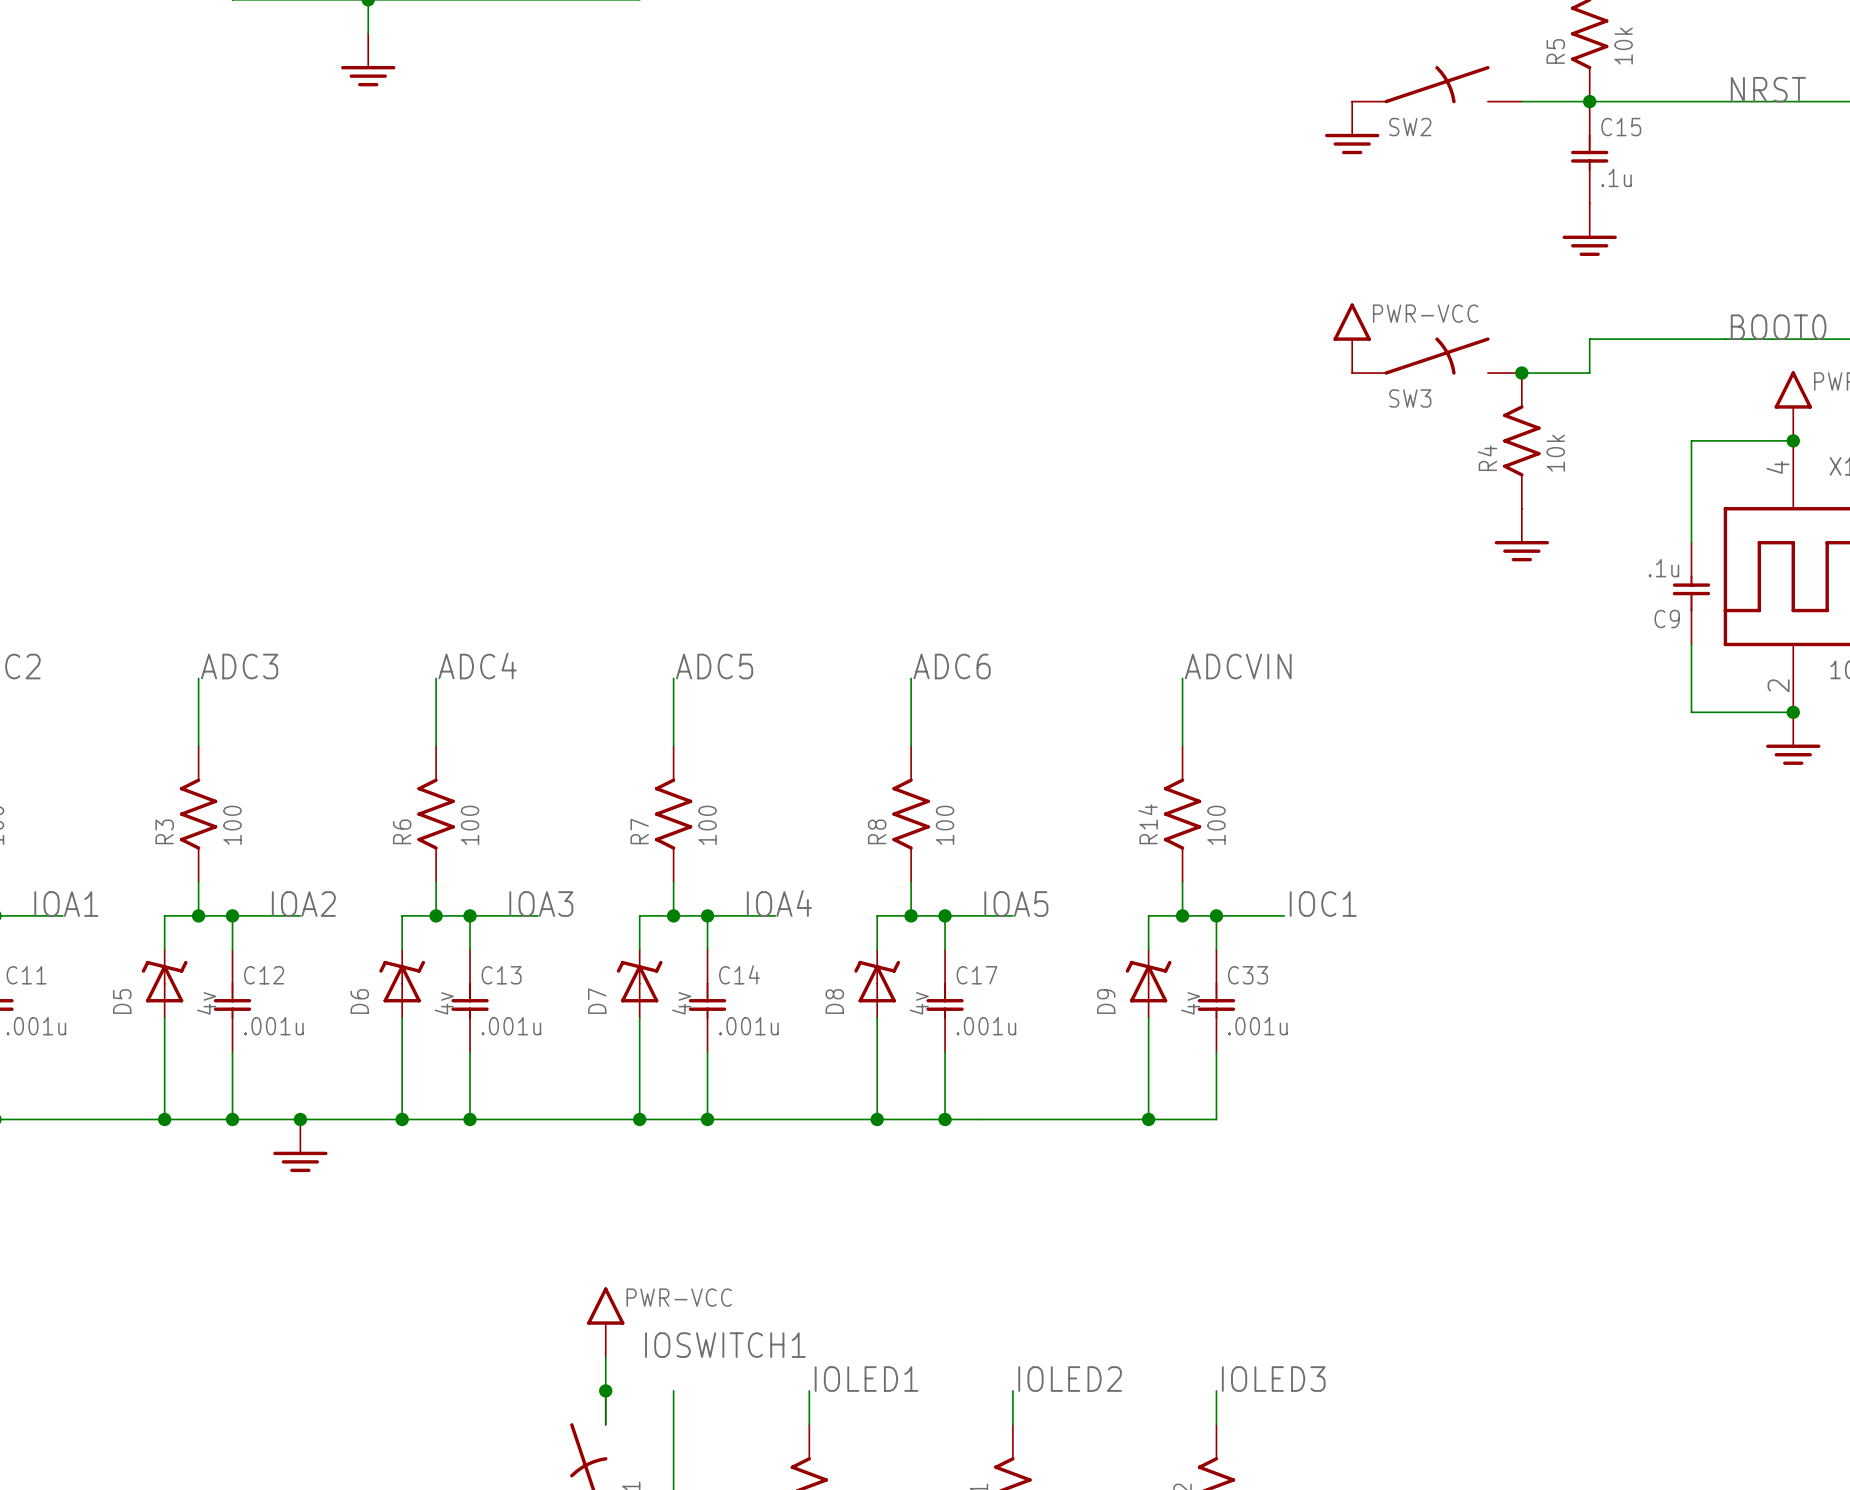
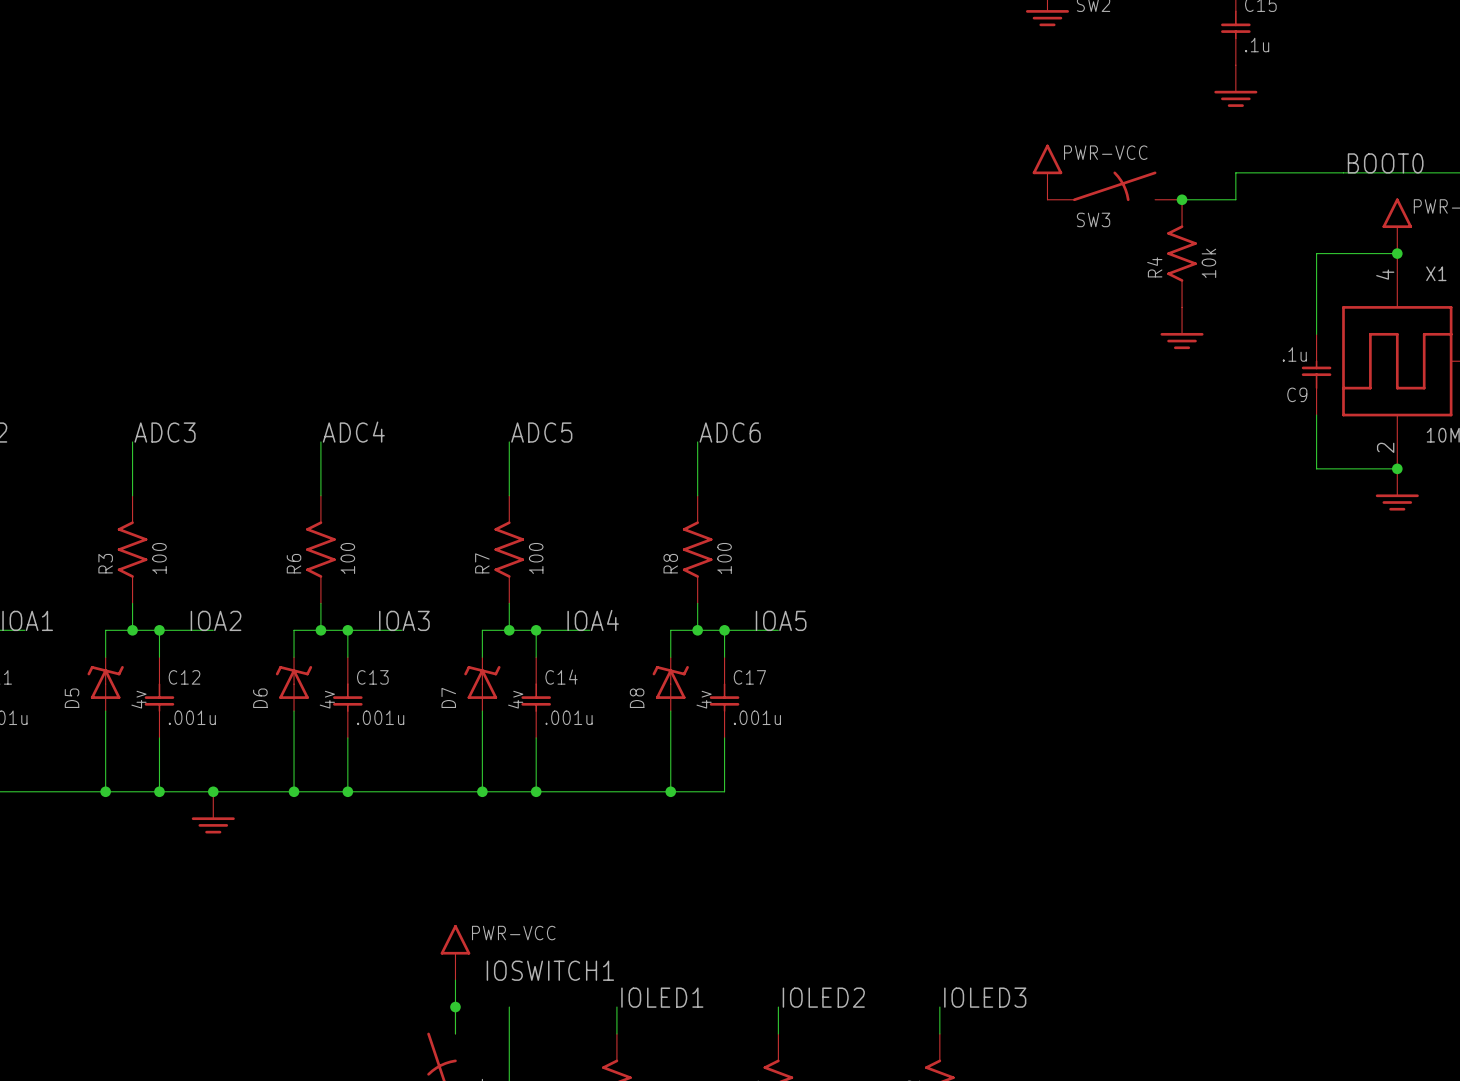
label: ADCVIN (1238, 666) -> none
wire: (1182, 678) (1182, 746) -> none
R14: 100 (1182, 814) -> none
wire: (1182, 881) (1182, 915) -> none
label: IOC1 (1323, 904) -> none
junction: (1182, 915) -> none
wire: (1216, 915) (1216, 949) -> none
junction: (1216, 915) -> none
wire: (1284, 915) (1148, 915) (1148, 949) -> none
D9: 4v (1148, 983) -> none
C33: .001u (1216, 1000) -> none
wire: (1148, 1017) (1148, 1119) -> none
wire: (1216, 1051) (1216, 1119) (945, 1119) -> none
junction: (945, 1119) -> none
junction: (1148, 1119) -> none

